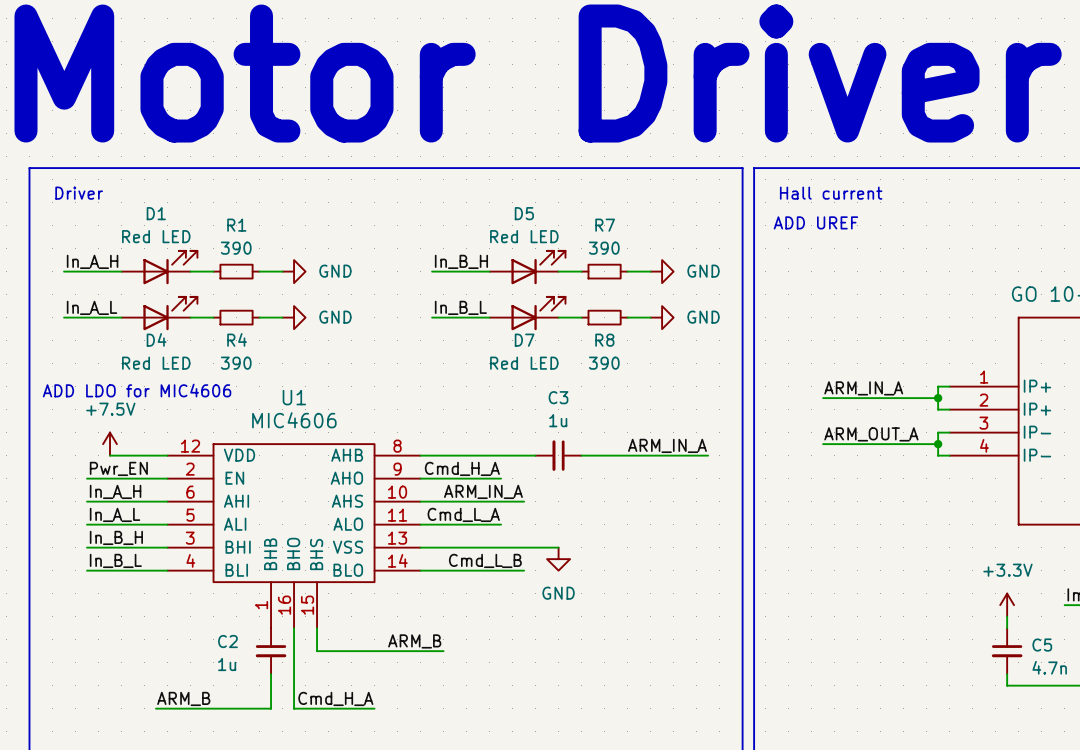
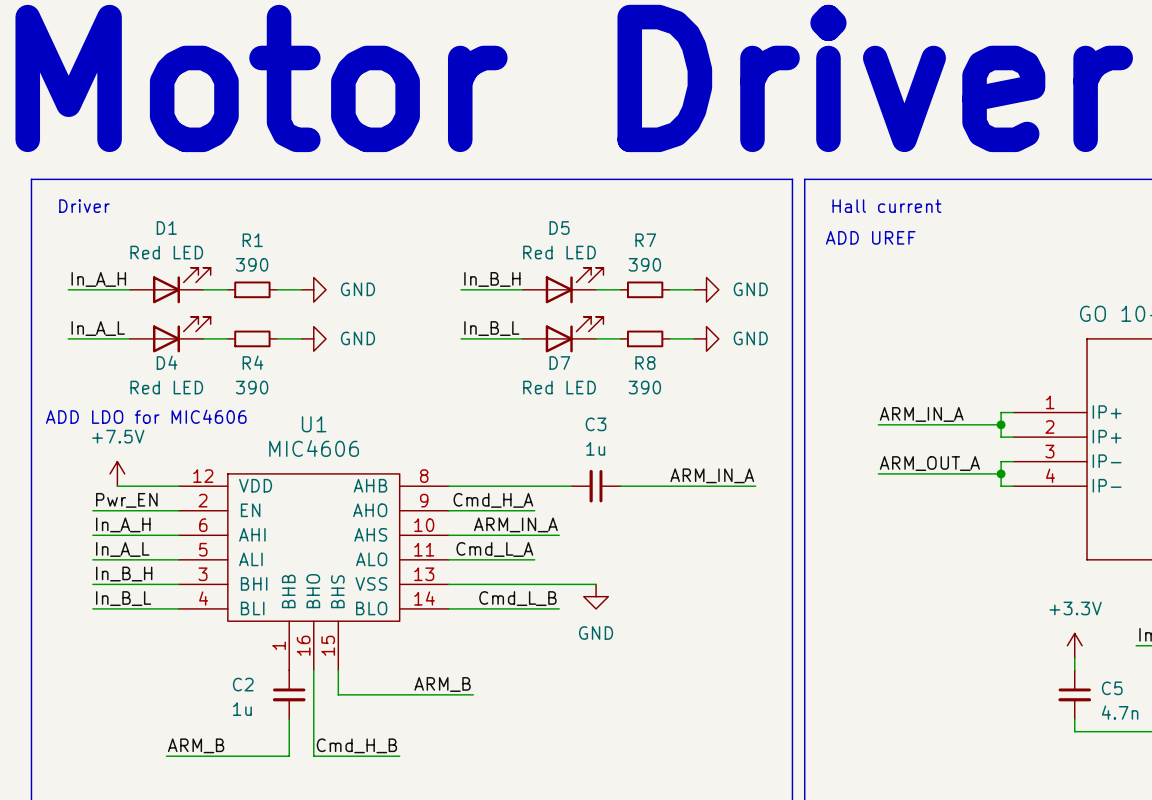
label: Cmd_H_A (335, 698) -> Cmd_H_B (356, 745)

